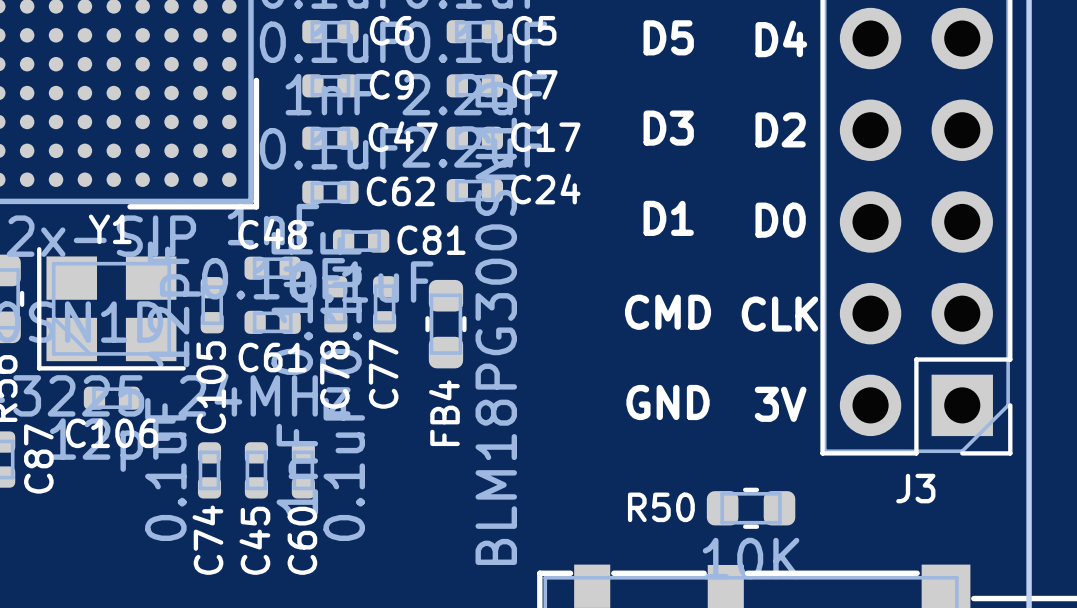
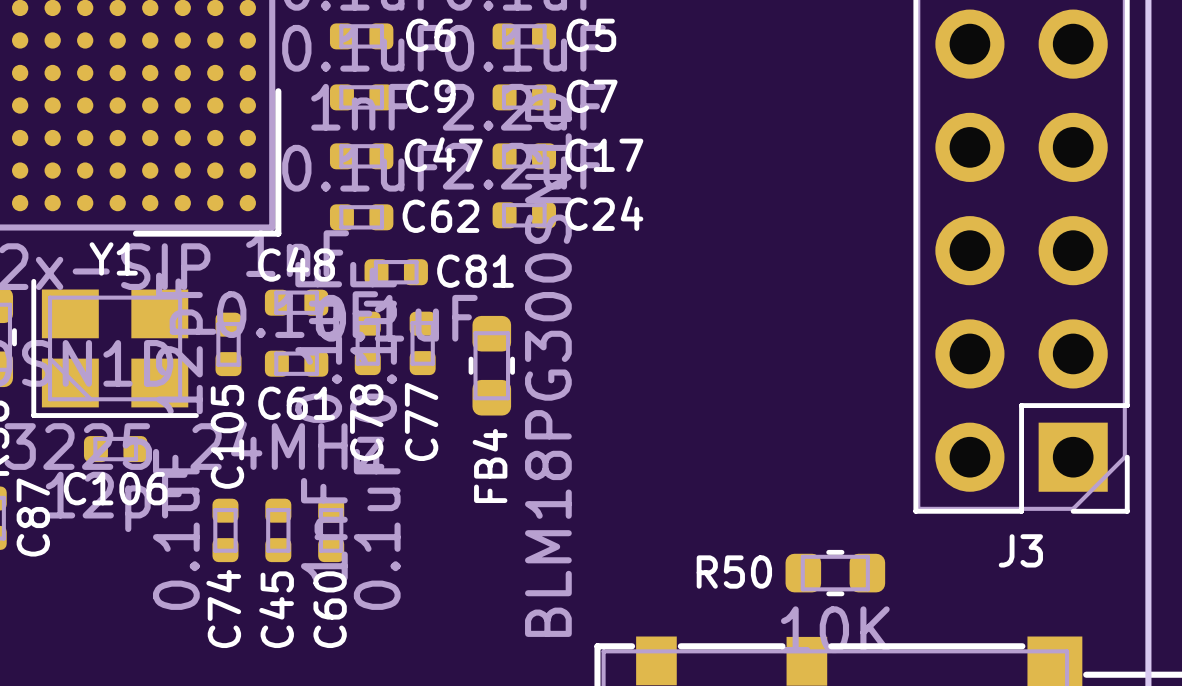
text: D5 (668, 37) -> none
text: D4 (781, 38) -> none
text: D3 (668, 128) -> none
text: D2 (780, 129) -> none
text: D1 (668, 218) -> none
text: D0 (780, 220) -> none
text: CMD (668, 312) -> none
text: CLK (779, 314) -> none
text: GND (668, 402) -> none
text: 3V (780, 404) -> none

